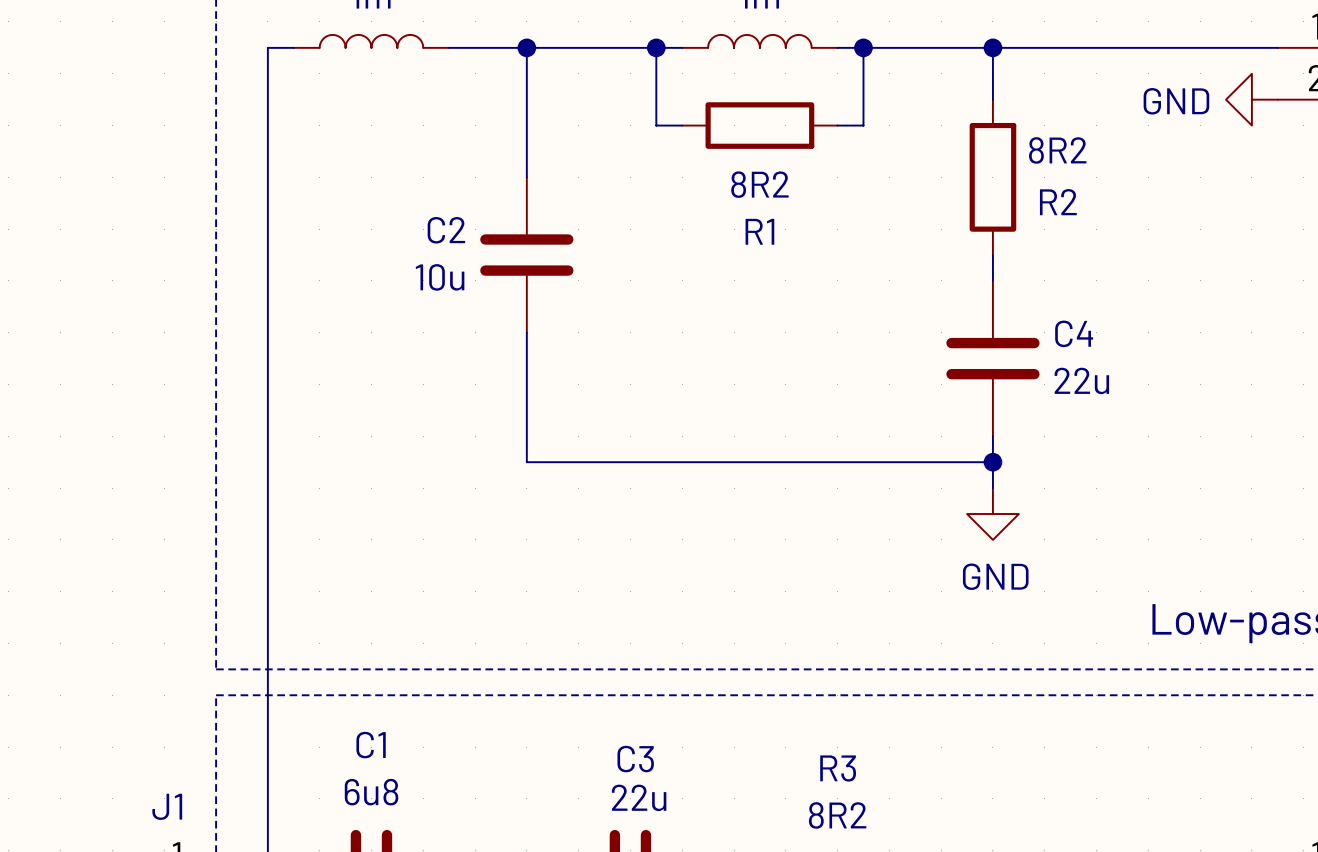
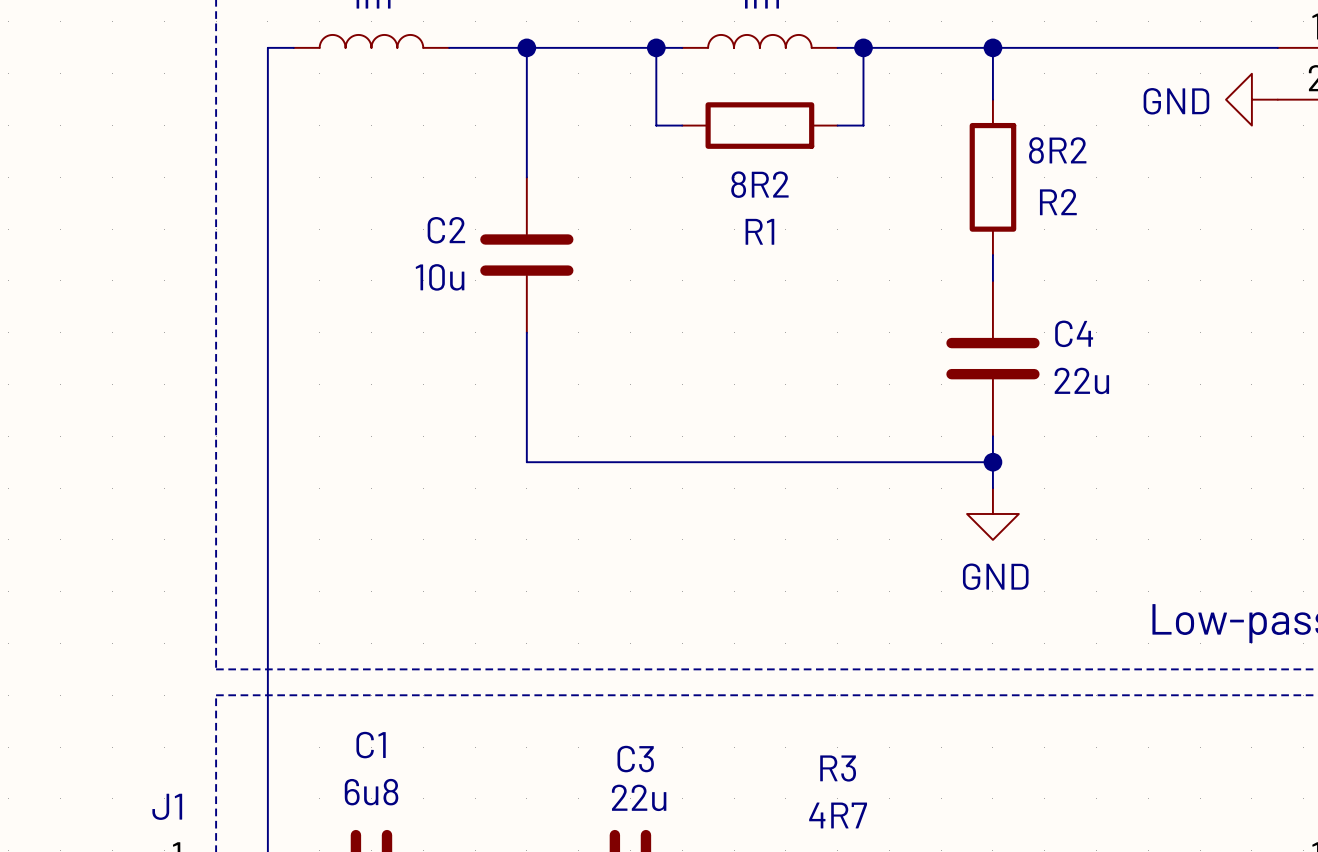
R3 value: 8R2 (837, 815) -> 4R7 (838, 815)

